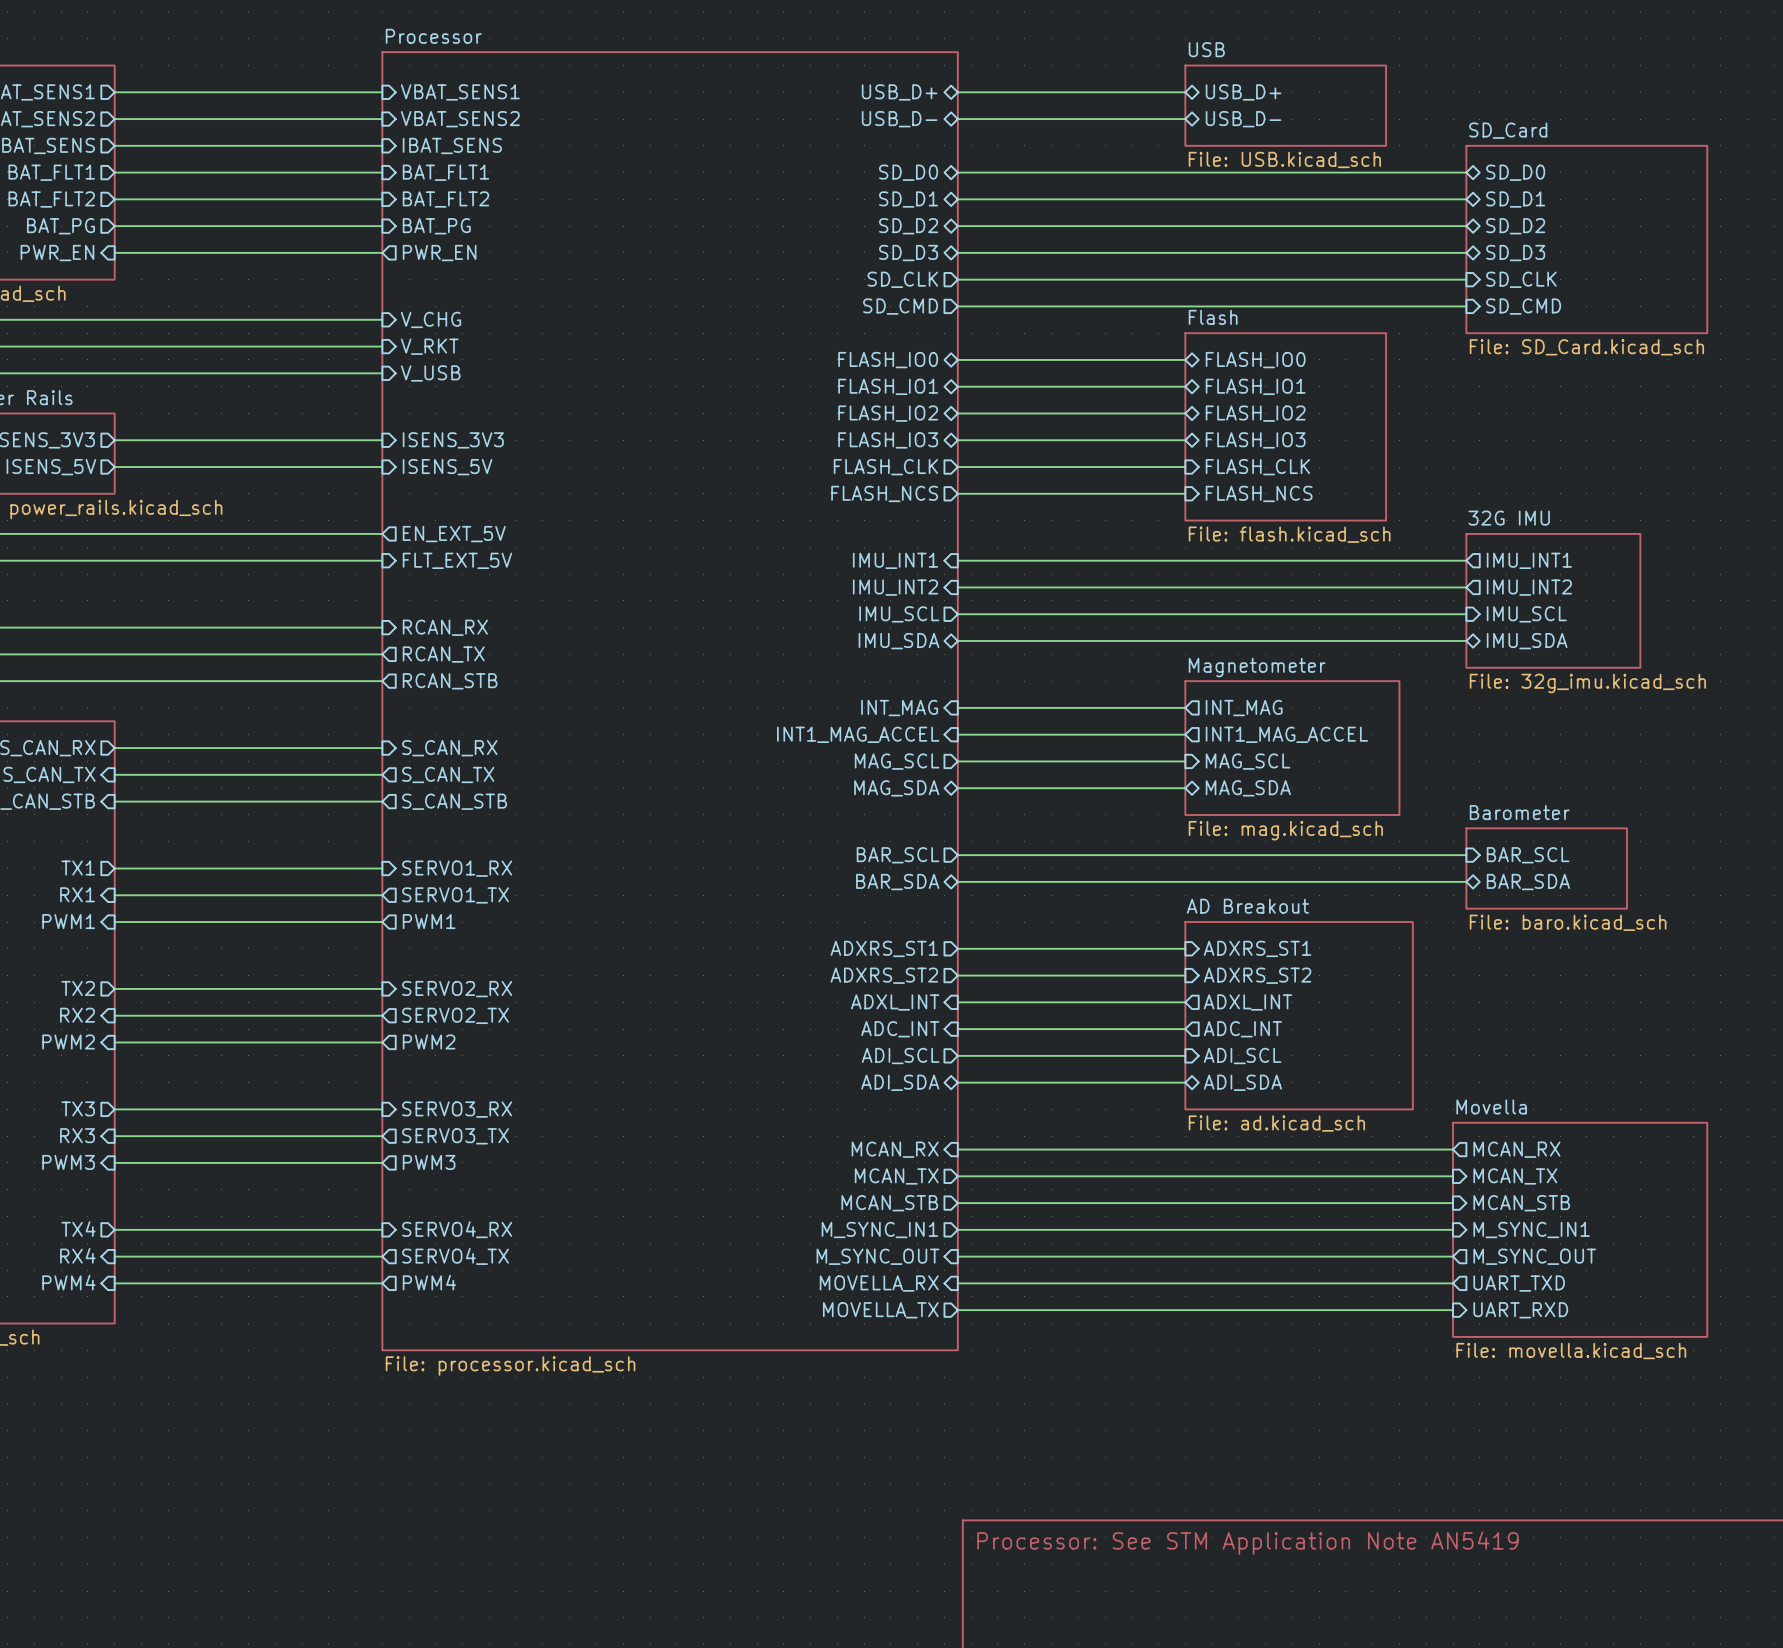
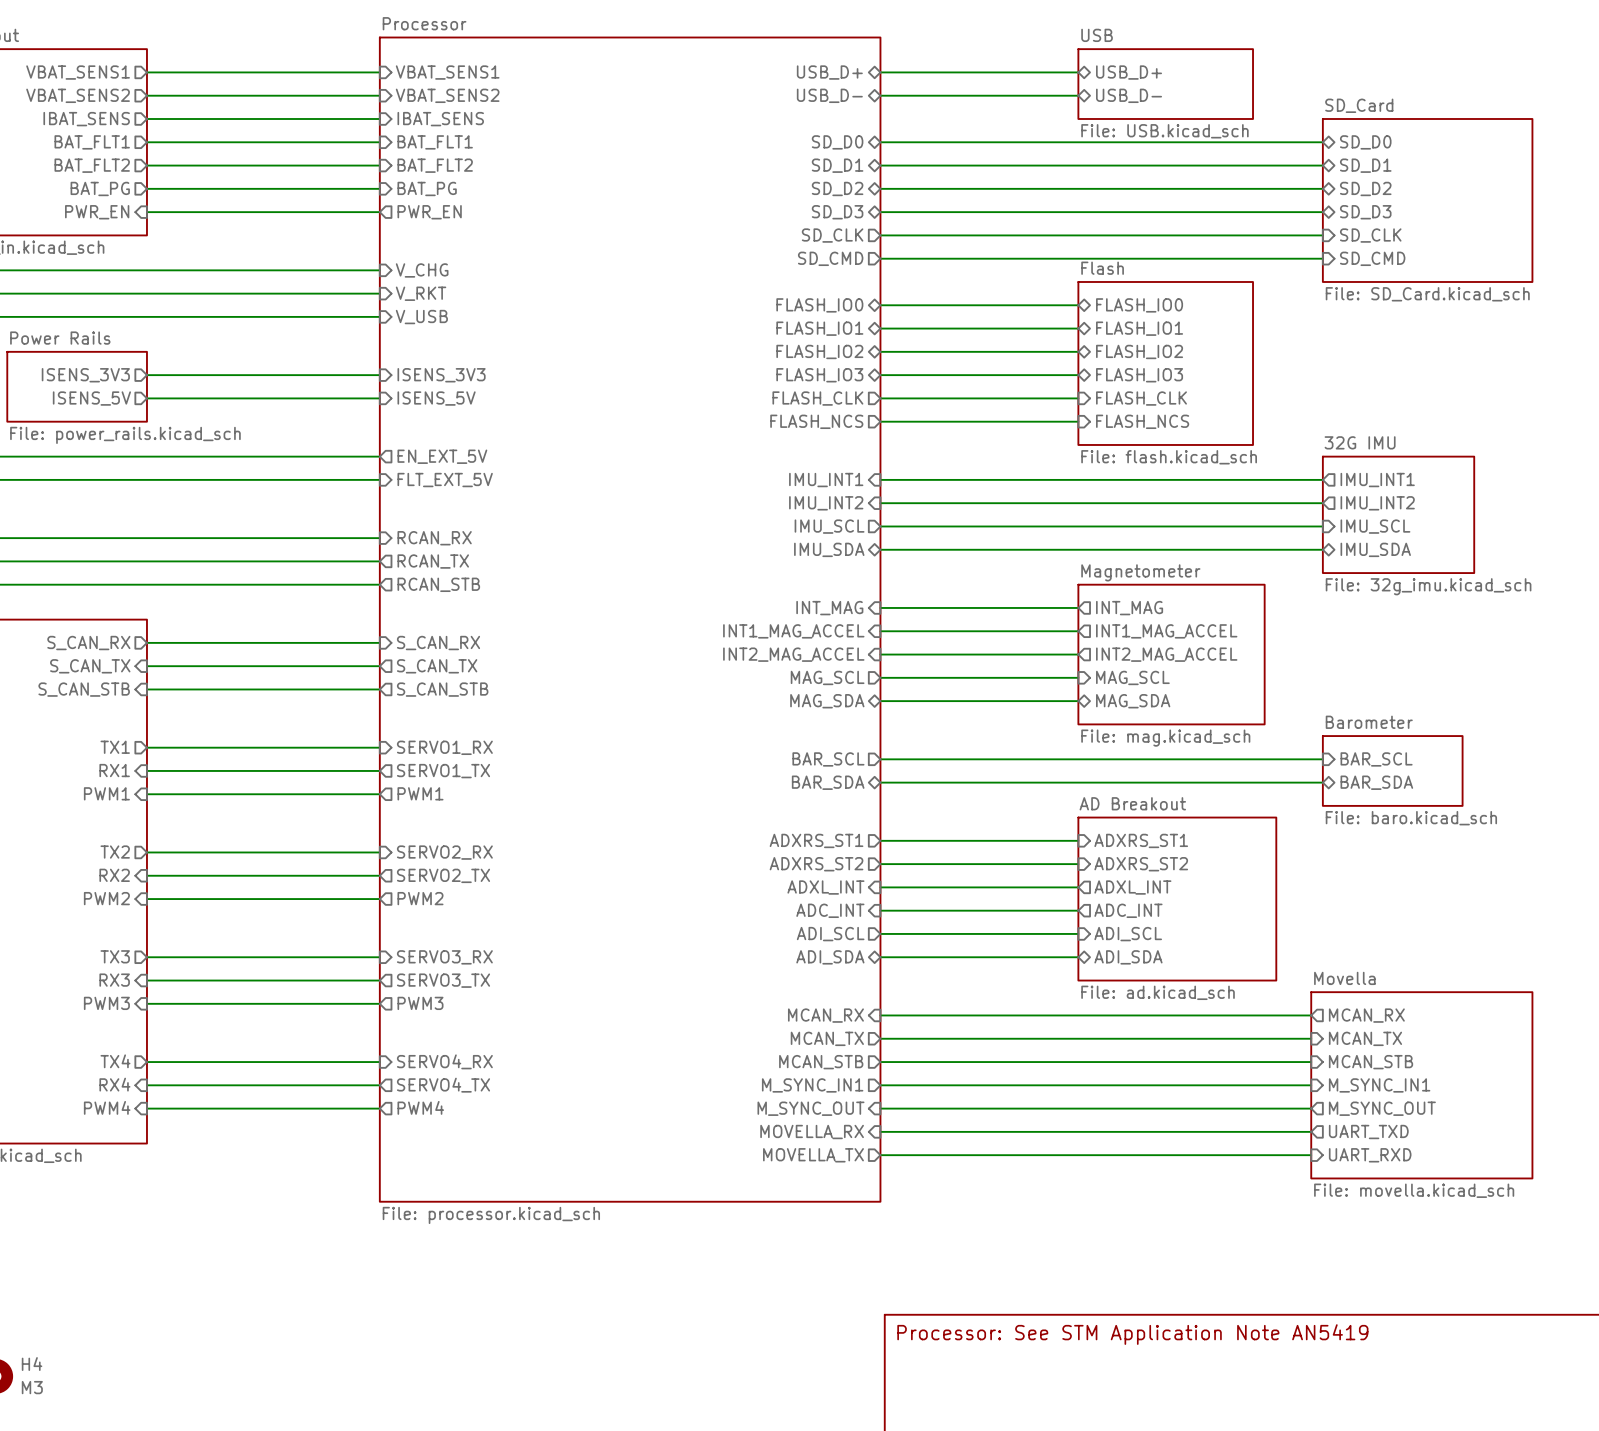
sheet Processor: File: processor.kicad_sch (670, 701) -> none
sheet Processor: none -> File: processor.kicad_sch (630, 619)
sheet Magnetometer: File: mag.kicad_sch (1292, 748) -> none
sheet pin shape: output (897, 761) -> input (793, 654)
sheet pin: MAG_SCL (897, 761) -> INT2_MAG_ACCEL (793, 654)
sheet pin shape: input (1248, 761) -> output (1166, 654)
sheet pin: MAG_SCL (1248, 761) -> INT2_MAG_ACCEL (1166, 654)
sheet Magnetometer: none -> File: mag.kicad_sch (1171, 654)
sheet pin shape: bidirectional (896, 788) -> output (827, 677)
sheet pin: MAG_SDA (896, 788) -> MAG_SCL (827, 677)
sheet pin shape: bidirectional (1248, 788) -> input (1132, 677)
sheet pin: MAG_SDA (1248, 788) -> MAG_SCL (1132, 677)
sheet pin: none -> MAG_SDA (827, 701)
sheet pin: none -> MAG_SDA (1133, 701)
sheet pin: BAR_SCL (898, 855) -> none
wire: (957, 855) (1466, 855) -> (880, 782) (1322, 782)
sheet pin: BAR_SCL (1528, 855) -> none
sheet Barometer position: (1546, 868) -> (1392, 770)
sheet pin shape: bidirectional (897, 882) -> output (828, 759)
sheet pin: BAR_SDA (897, 882) -> BAR_SCL (828, 759)
sheet pin shape: bidirectional (1528, 882) -> input (1376, 759)
sheet pin: BAR_SDA (1528, 882) -> BAR_SCL (1376, 759)
sheet pin: none -> BAR_SDA (828, 782)
sheet pin: none -> BAR_SDA (1376, 782)
sheet pin: ADXRS_ST1 (884, 948) -> none
wire: (957, 948) (1185, 948) -> (880, 701) (1078, 701)
sheet pin: ADXRS_ST1 (1257, 948) -> none
sheet pin: ADXRS_ST2 (884, 975) -> ADXRS_ST1 (816, 840)
sheet pin: ADXRS_ST2 (1257, 975) -> ADXRS_ST1 (1141, 840)
sheet pin shape: input (895, 1002) -> output (816, 864)
sheet pin: ADXL_INT (895, 1002) -> ADXRS_ST2 (816, 864)
sheet pin shape: output (1248, 1002) -> input (1141, 864)
sheet pin: ADXL_INT (1248, 1002) -> ADXRS_ST2 (1141, 864)
sheet AD Breakout position: (1299, 1015) -> (1177, 899)
sheet pin: ADC_INT (900, 1029) -> ADXL_INT (825, 887)
sheet pin: ADC_INT (1242, 1029) -> ADXL_INT (1132, 887)
sheet pin shape: output (900, 1056) -> input (830, 910)
sheet pin: ADI_SCL (900, 1056) -> ADC_INT (830, 910)
sheet pin shape: input (1242, 1056) -> output (1128, 910)
sheet pin: ADI_SCL (1242, 1056) -> ADC_INT (1128, 910)
sheet pin shape: bidirectional (900, 1082) -> output (830, 934)
sheet pin: ADI_SDA (900, 1082) -> ADI_SCL (830, 934)
sheet pin shape: bidirectional (1242, 1082) -> input (1128, 934)
sheet pin: ADI_SDA (1242, 1082) -> ADI_SCL (1128, 934)
sheet pin: none -> ADI_SDA (830, 957)
wire: none -> (880, 957) (1078, 957)
sheet pin: none -> ADI_SDA (1128, 957)
sheet pin: MCAN_RX (895, 1149) -> none
wire: (957, 1149) (1453, 1149) -> (880, 1155) (1311, 1155)
sheet pin: MCAN_RX (1516, 1149) -> none
sheet pin shape: output (896, 1176) -> input (825, 1015)
sheet pin: MCAN_TX (896, 1176) -> MCAN_RX (825, 1015)
sheet pin shape: input (1515, 1176) -> output (1366, 1015)
sheet pin: MCAN_TX (1515, 1176) -> MCAN_RX (1366, 1015)
sheet pin: MCAN_STB (889, 1203) -> MCAN_TX (827, 1038)
sheet pin: MCAN_STB (1521, 1203) -> MCAN_TX (1365, 1038)
sheet pin: M_SYNC_IN1 (879, 1229) -> MCAN_STB (821, 1062)
sheet pin: M_SYNC_IN1 (1531, 1229) -> MCAN_STB (1371, 1062)
sheet Movella position: (1580, 1229) -> (1421, 1085)
sheet pin shape: input (877, 1256) -> output (812, 1085)
sheet pin: M_SYNC_OUT (877, 1256) -> M_SYNC_IN1 (812, 1085)
sheet pin shape: output (1534, 1256) -> input (1379, 1085)
sheet pin: M_SYNC_OUT (1534, 1256) -> M_SYNC_IN1 (1379, 1085)
sheet pin: MOVELLA_RX (879, 1283) -> M_SYNC_OUT (810, 1108)
sheet pin: UART_TXD (1519, 1283) -> M_SYNC_OUT (1382, 1108)
sheet pin shape: output (880, 1310) -> input (812, 1132)
sheet pin: MOVELLA_TX (880, 1310) -> MOVELLA_RX (812, 1132)
sheet pin shape: input (1520, 1310) -> output (1368, 1132)
sheet pin: UART_RXD (1520, 1310) -> UART_TXD (1368, 1132)
sheet pin: none -> MOVELLA_TX (813, 1155)
sheet pin: none -> UART_RXD (1370, 1155)

